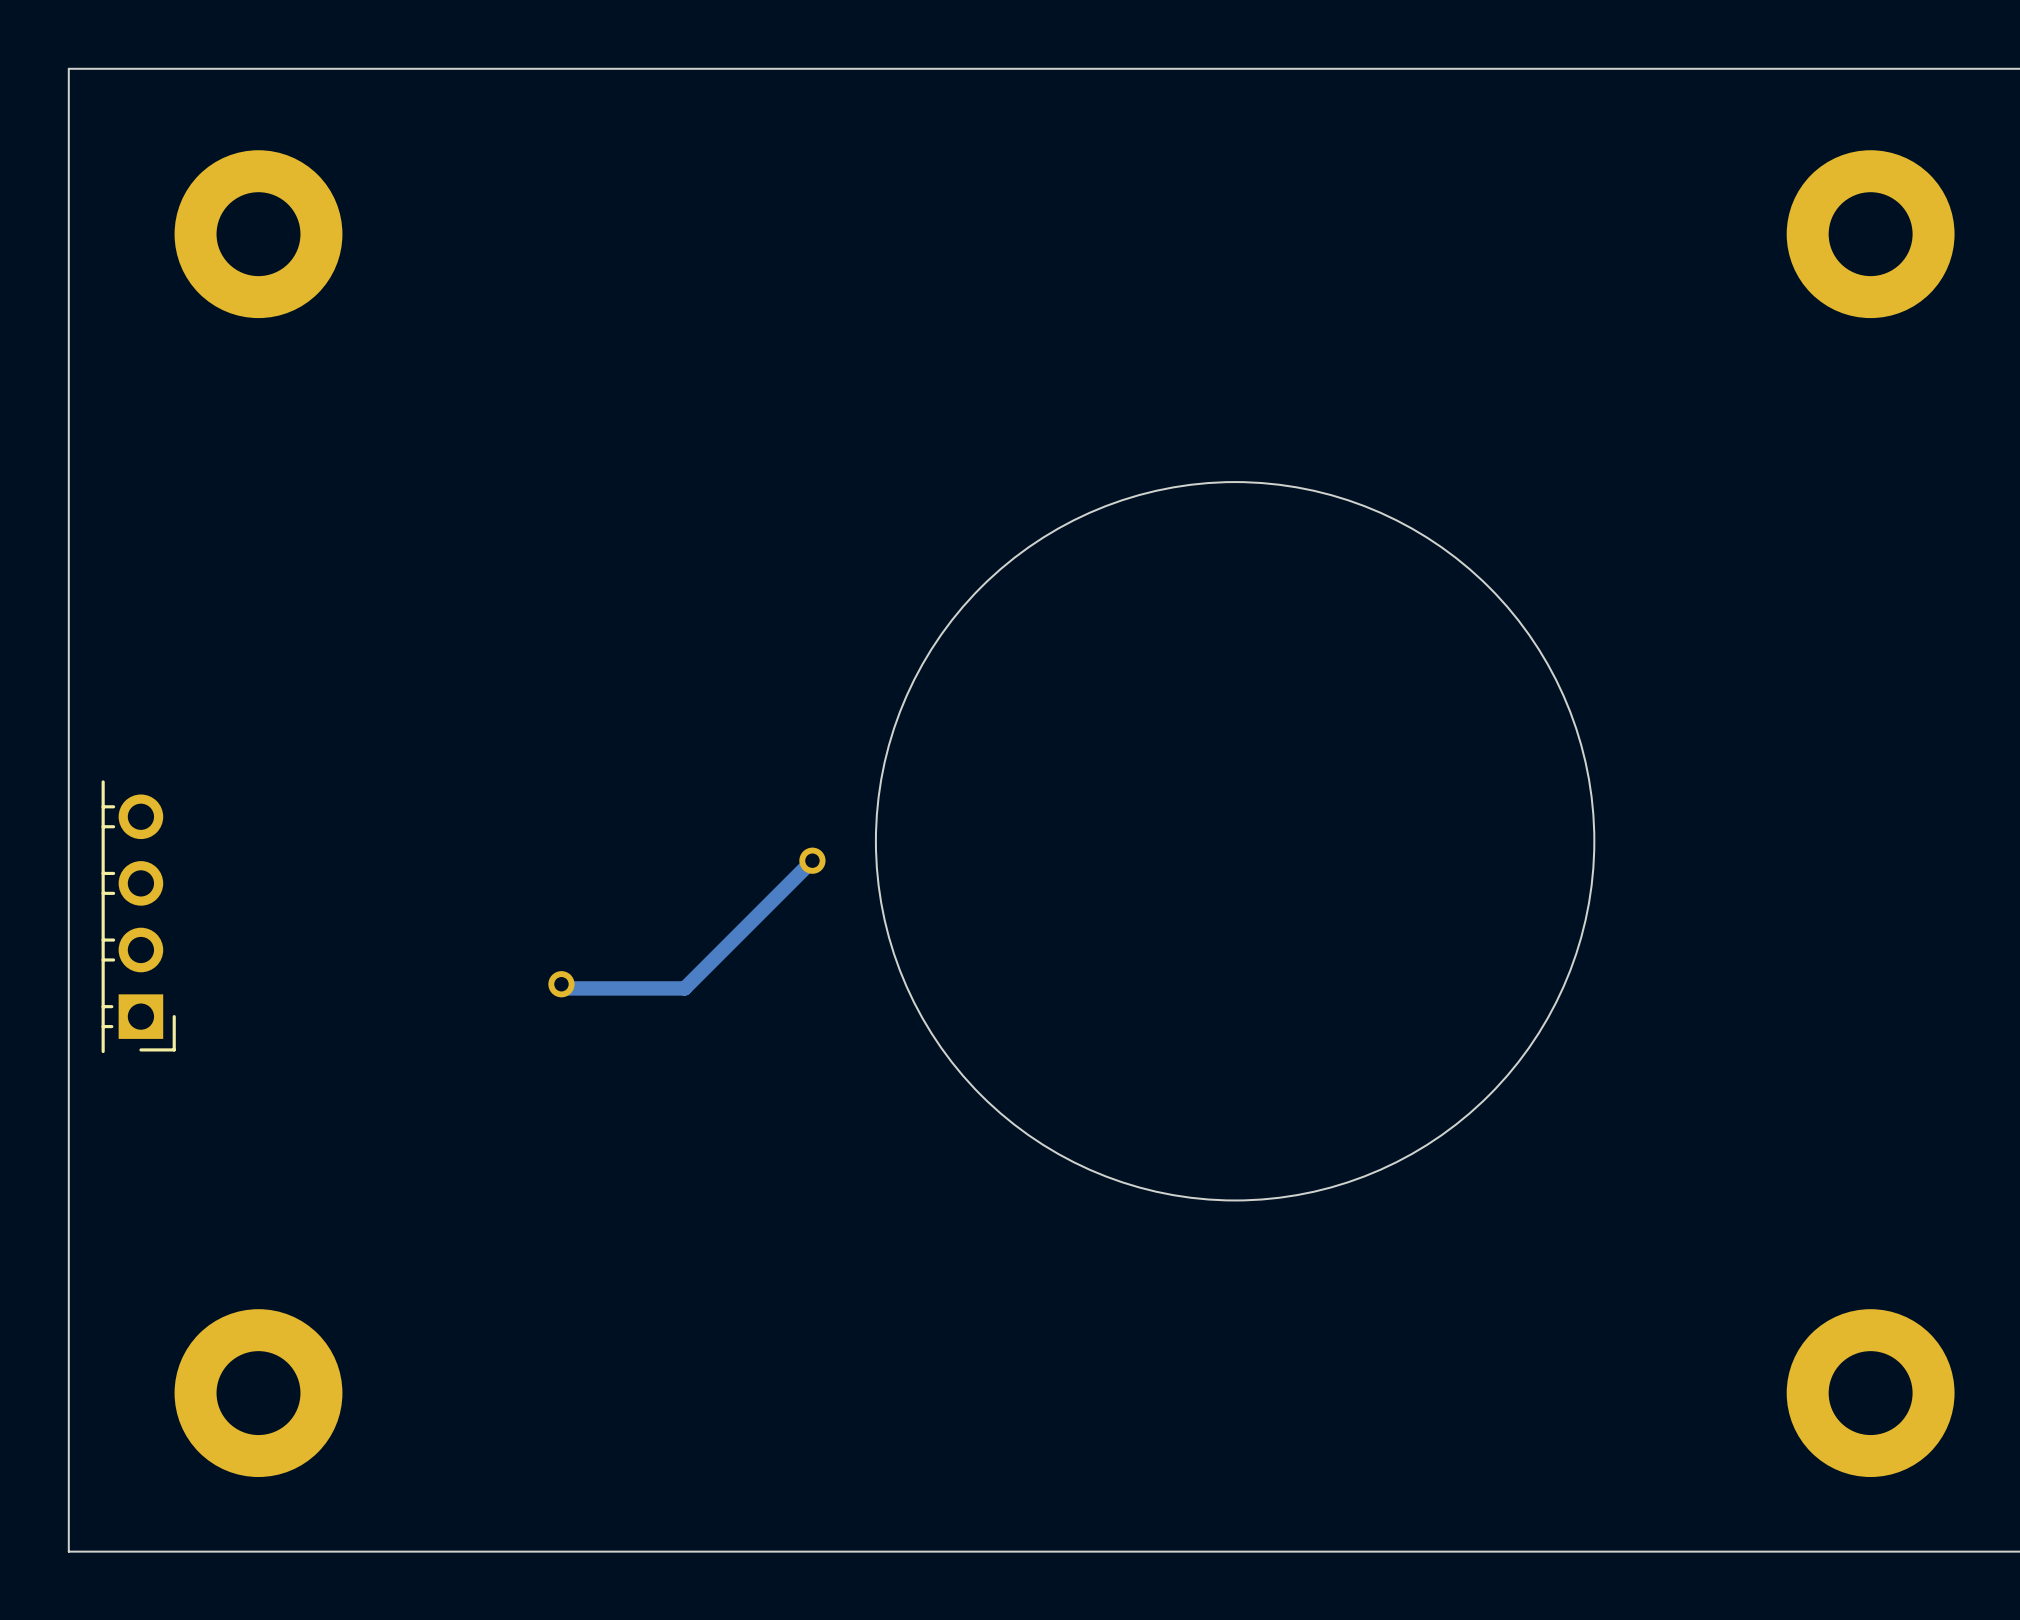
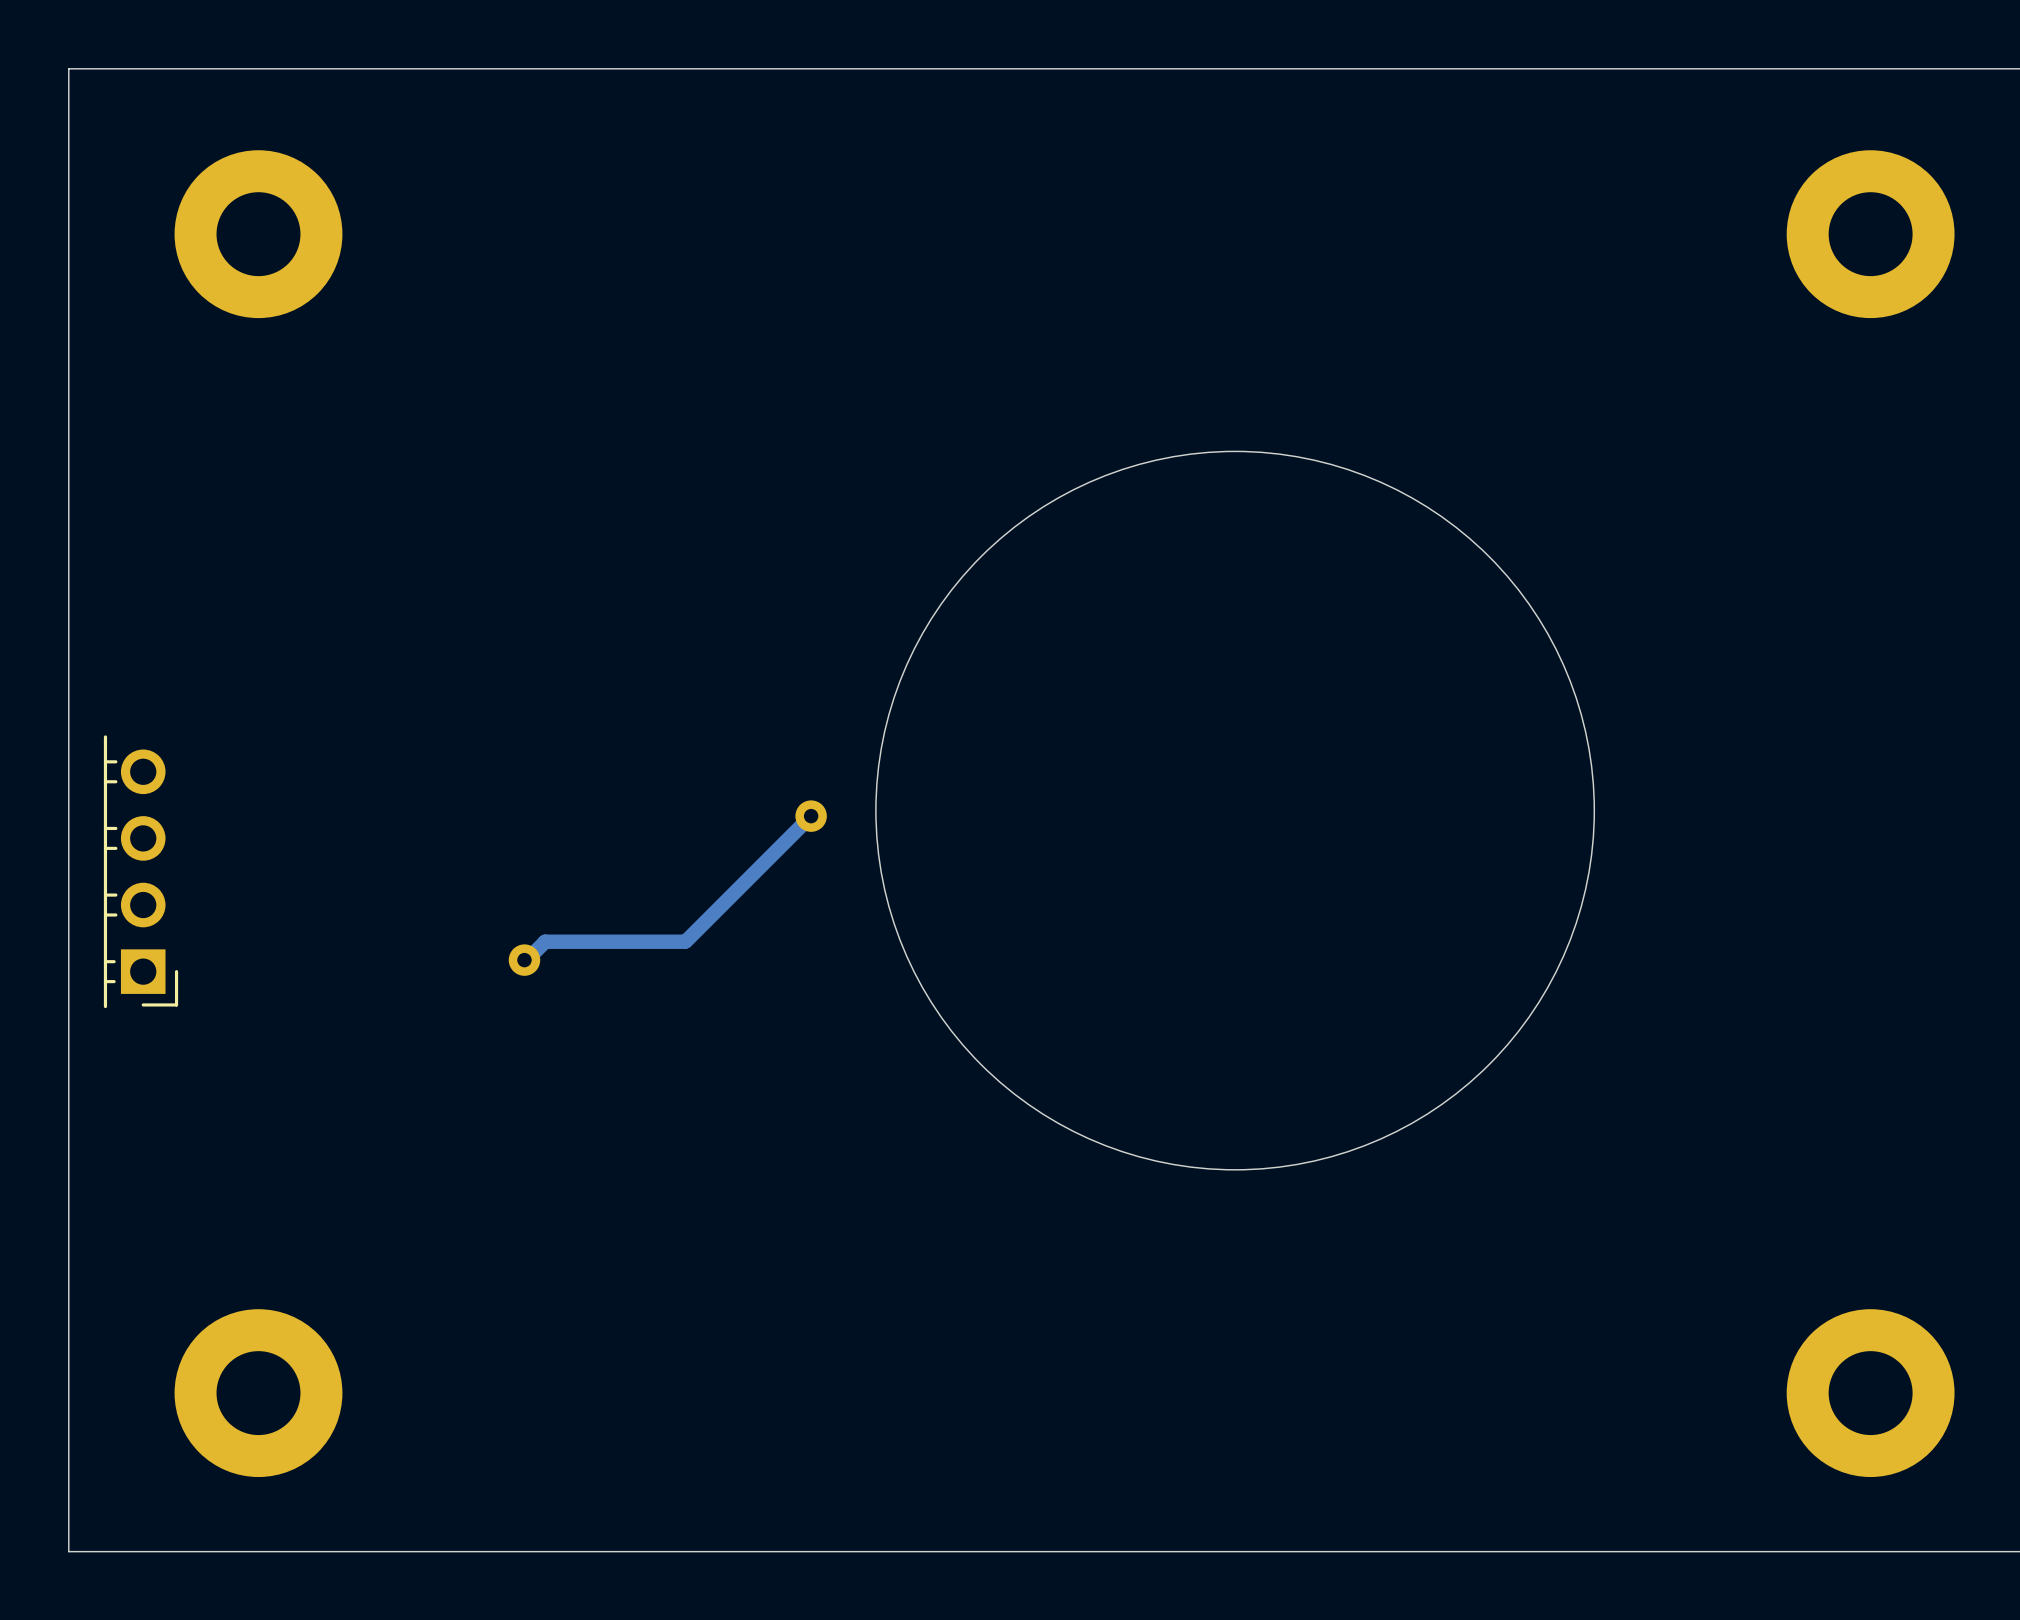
round board edge position: (1235, 841) -> (1235, 810)
part: none -> (667, 888)
part position: (138, 916) -> (141, 871)
part: (686, 922) -> none

